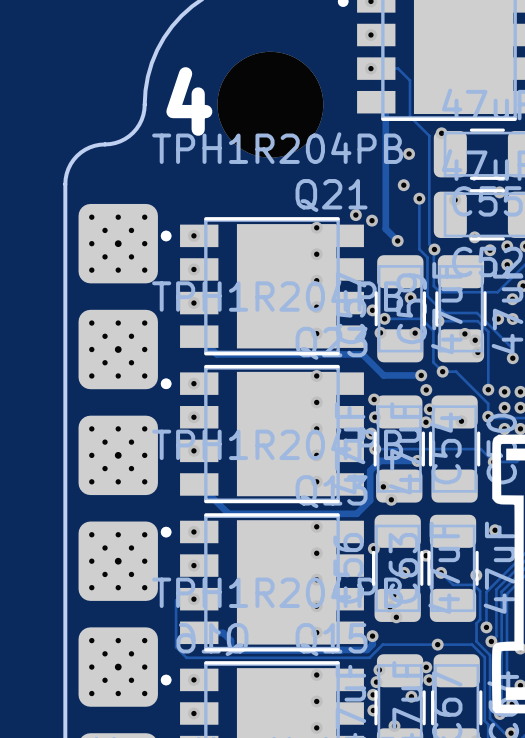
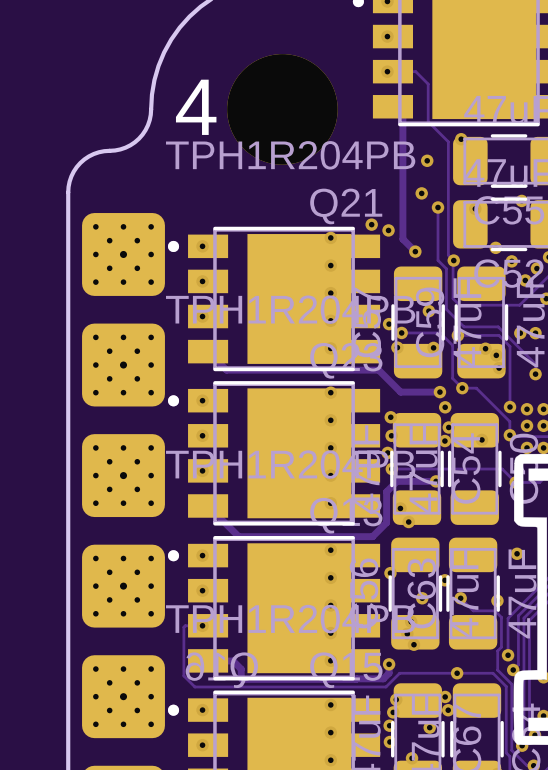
via: (507, 246) -> none
via: none -> (536, 268)
via: (507, 264) -> none
via: none -> (525, 280)
via: (512, 299) -> none

